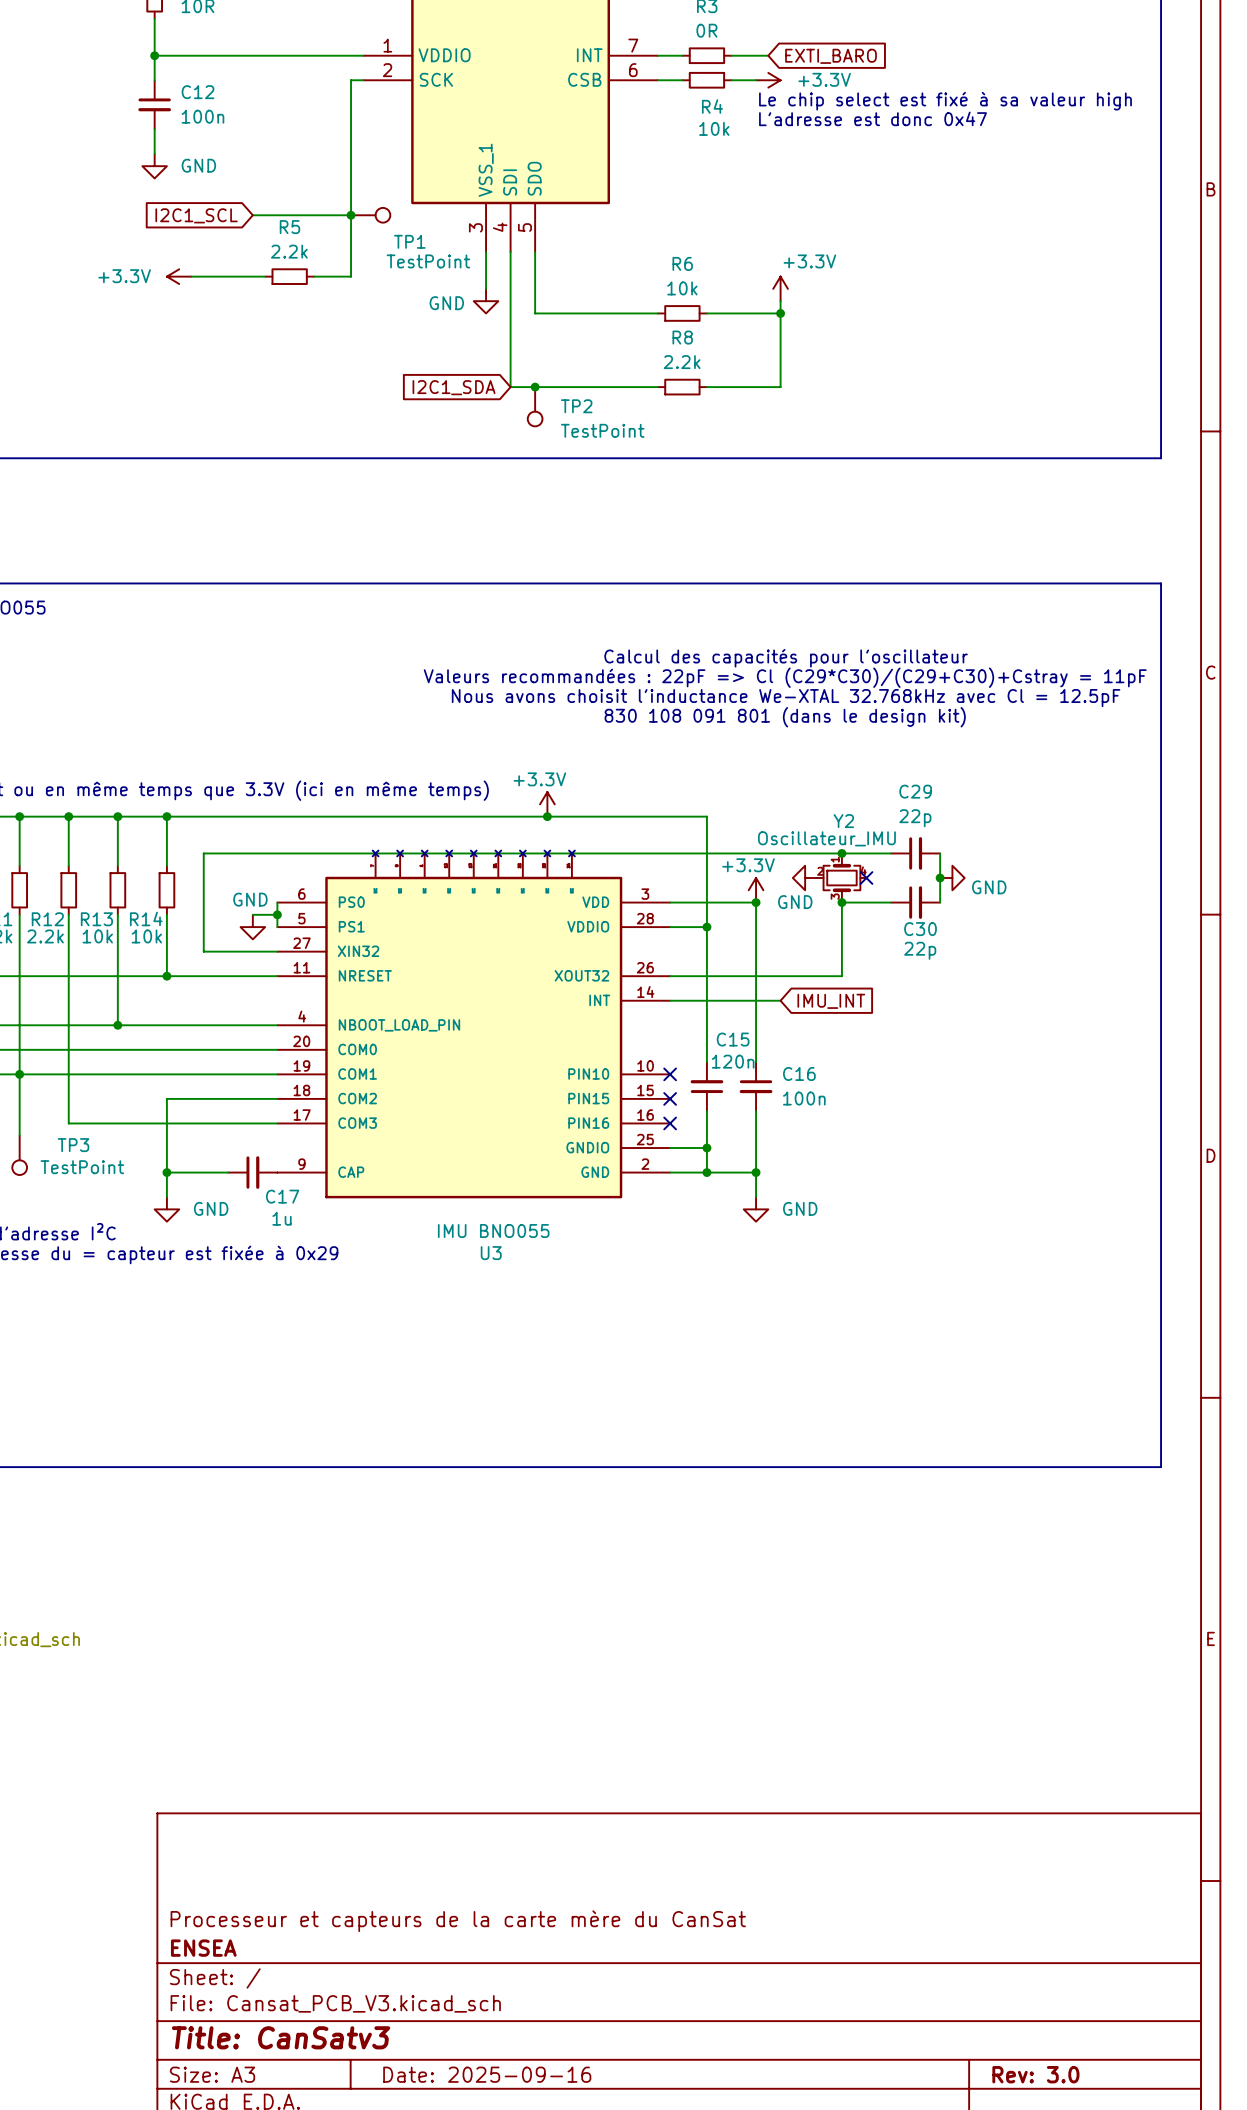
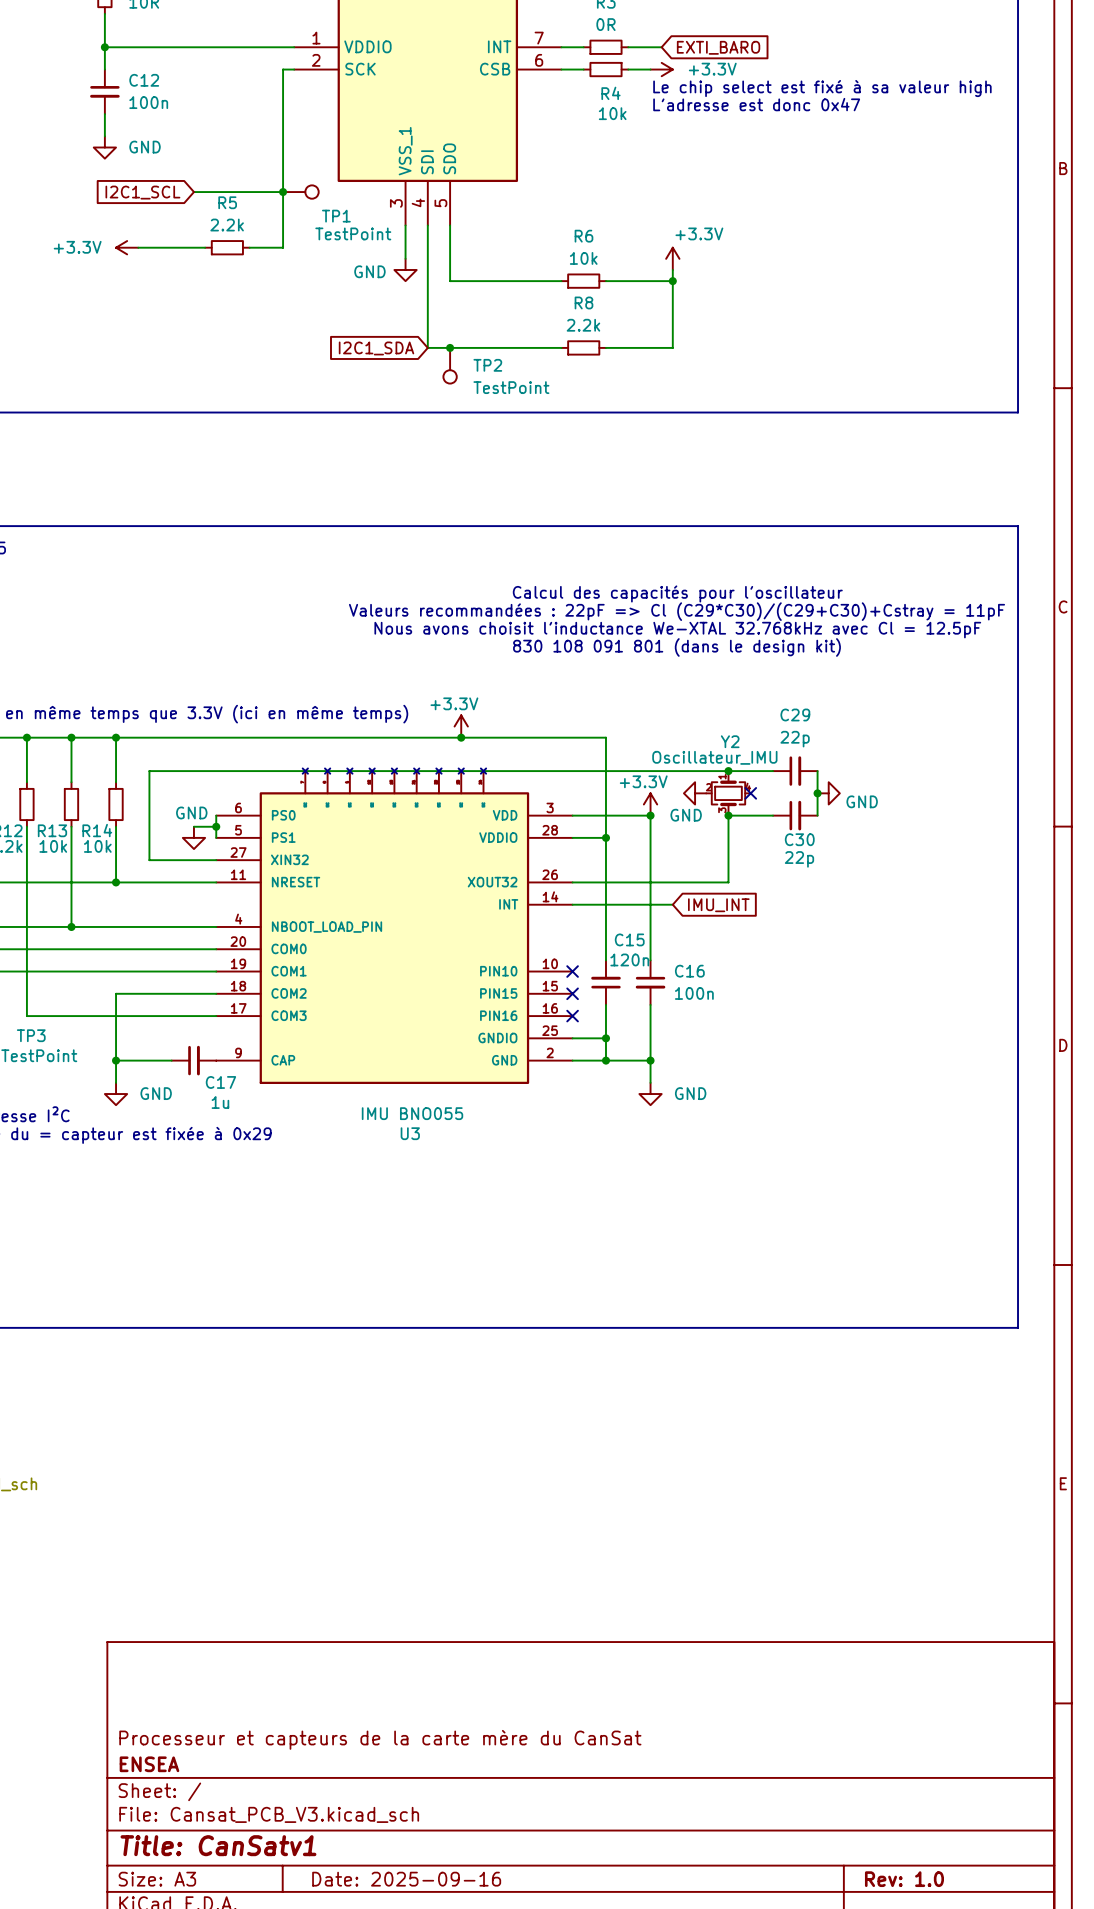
title block: Title: CanSatv3 (281, 2037) -> Title: CanSatv1 (218, 1845)
title block: Rev: 3.0 (1035, 2074) -> Rev: 1.0 (904, 1879)

